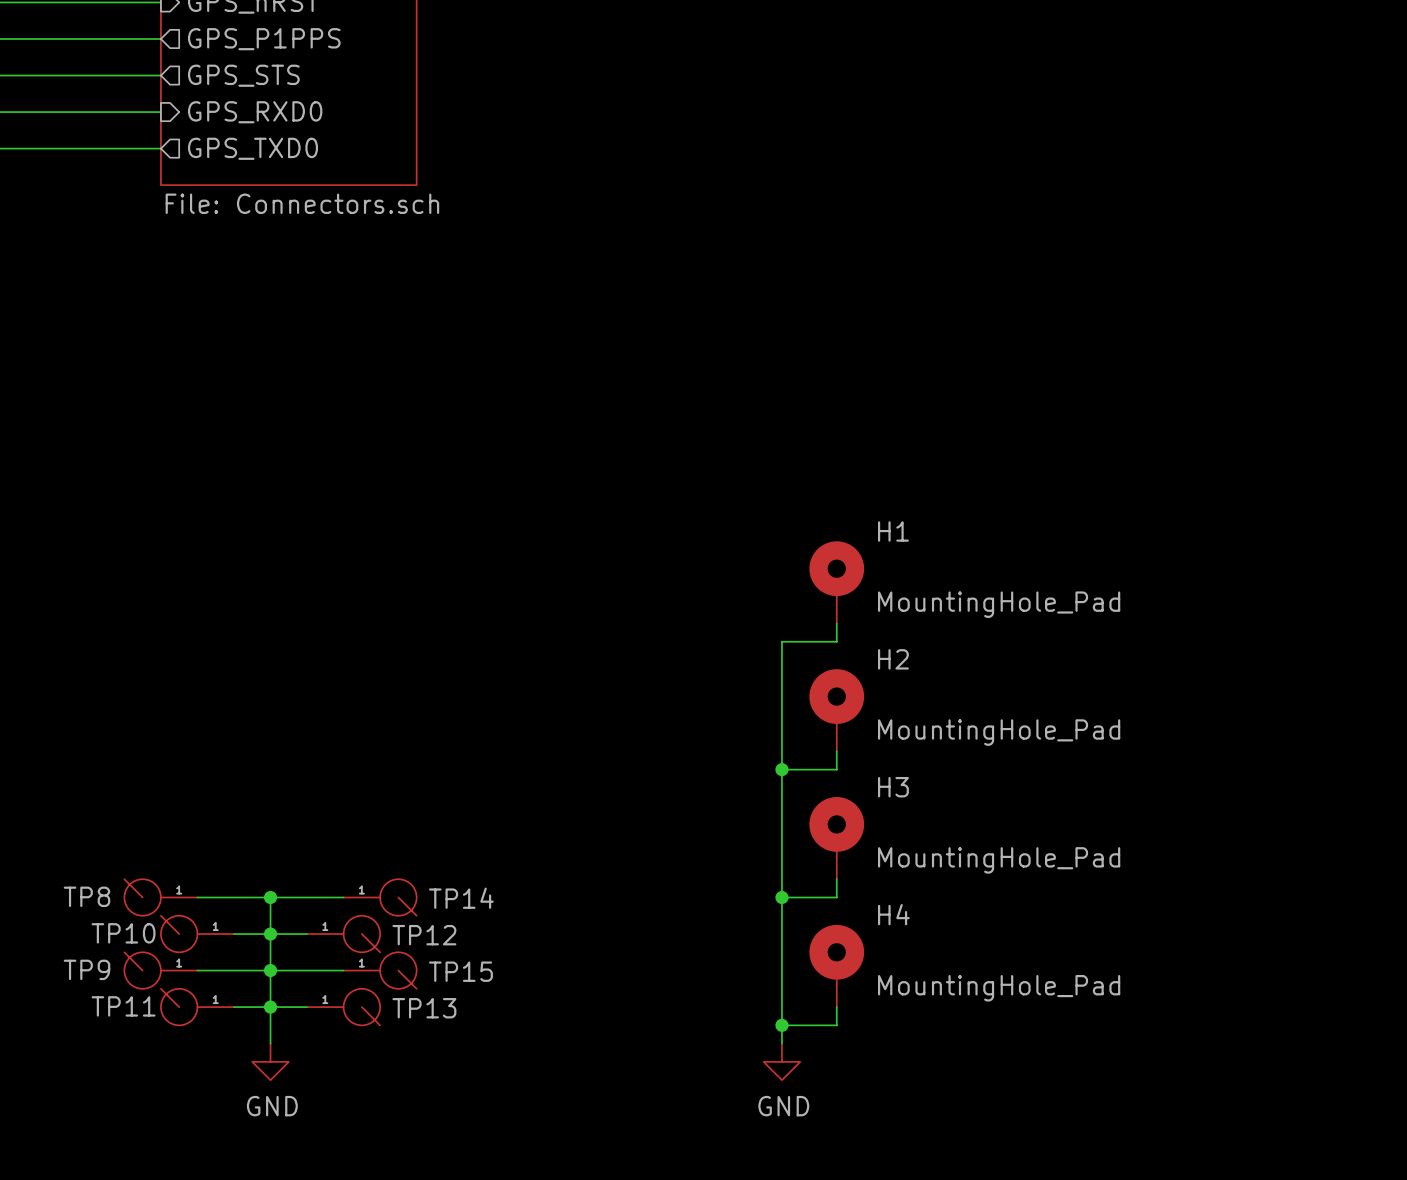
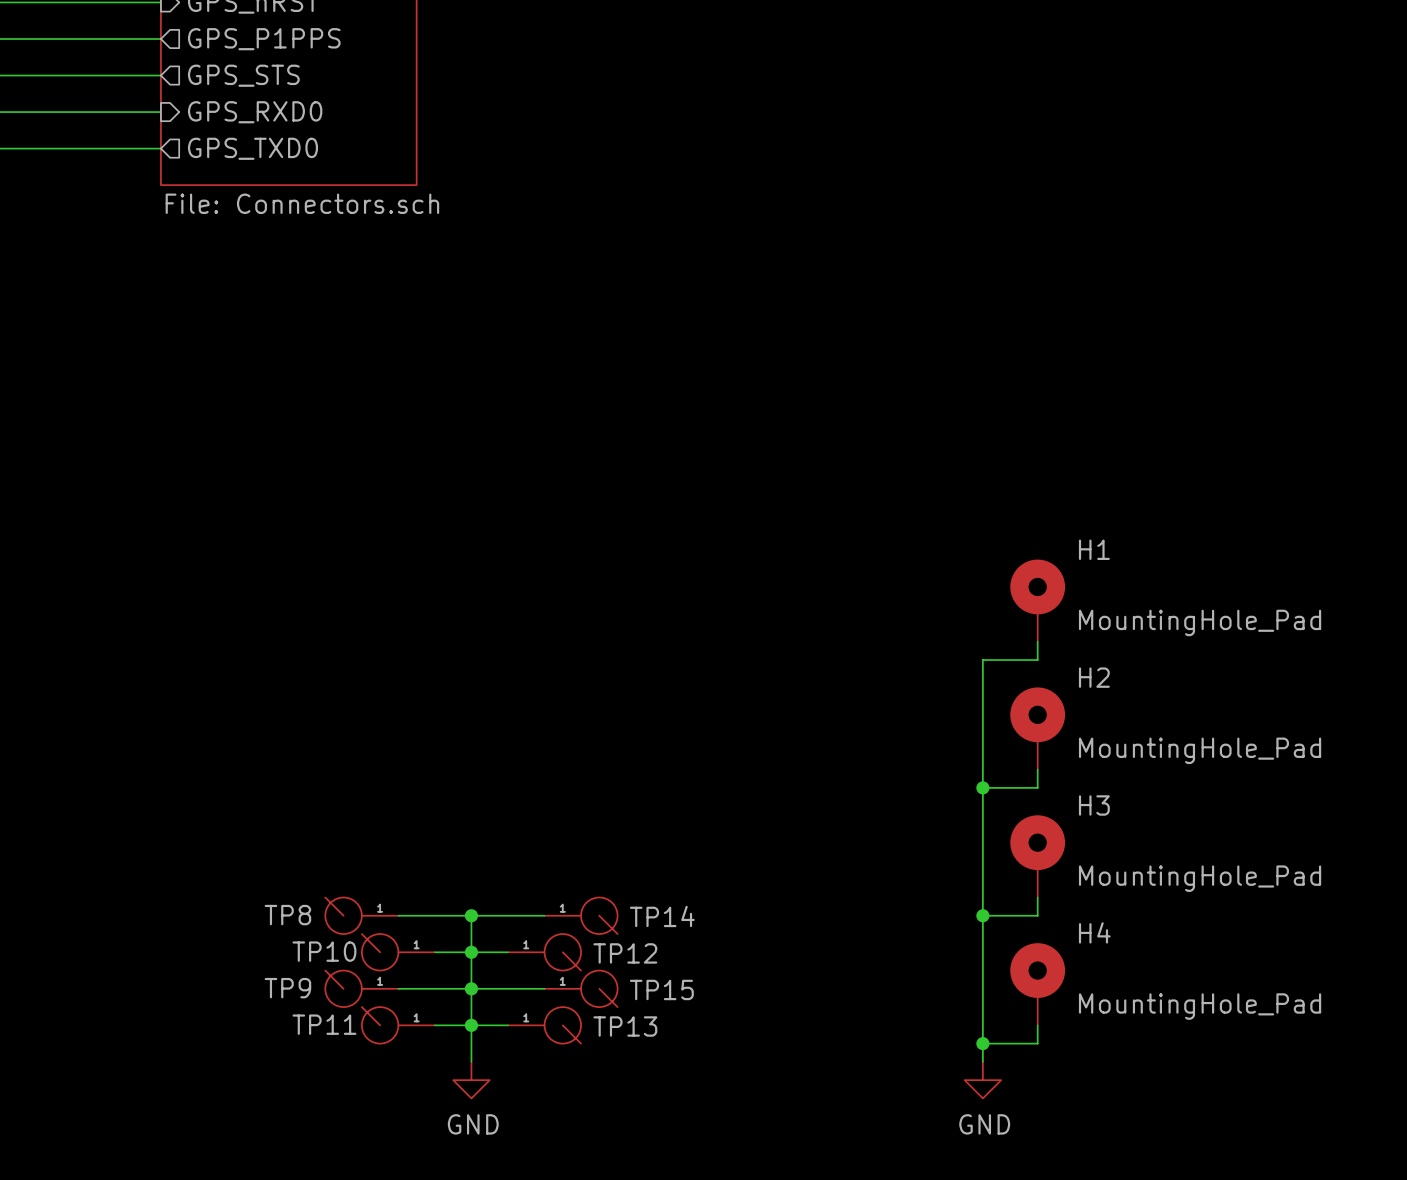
H1 position: (836, 582) -> (1037, 600)
wire: (836, 623) (836, 641) (781, 641) (781, 1043) -> (1037, 641) (1037, 660) (982, 660) (982, 1061)
H2 position: (836, 710) -> (1037, 728)
wire: (836, 751) (836, 769) (781, 769) -> (1037, 769) (1037, 787) (982, 787)
junction: (781, 769) -> none
junction: none -> (982, 787)
H3 position: (836, 838) -> (1037, 856)
wire: (836, 879) (836, 897) (781, 897) -> (1037, 897) (1037, 915) (982, 915)
TP8 position: (160, 897) -> (361, 915)
wire: (197, 897) (343, 897) -> (398, 915) (544, 915)
wire: (270, 897) (270, 1043) -> (471, 915) (471, 1061)
junction: (270, 897) -> none
TP14 position: (380, 897) -> (581, 915)
junction: (781, 897) -> none
junction: none -> (471, 915)
junction: none -> (982, 915)
TP10 position: (197, 934) -> (398, 952)
wire: (233, 934) (307, 934) -> (434, 952) (507, 952)
junction: (270, 934) -> none
TP12 position: (343, 934) -> (544, 952)
junction: none -> (471, 952)
H4 position: (836, 965) -> (1037, 984)
TP9 position: (160, 970) -> (361, 988)
wire: (197, 970) (343, 970) -> (398, 988) (544, 988)
junction: (270, 970) -> none
TP15 position: (380, 970) -> (581, 988)
junction: none -> (471, 988)
TP11 position: (197, 1007) -> (398, 1025)
wire: (233, 1007) (307, 1007) -> (434, 1025) (507, 1025)
junction: (270, 1007) -> none
TP13 position: (343, 1007) -> (544, 1025)
wire: (836, 1007) (836, 1025) (781, 1025) -> (1037, 1025) (1037, 1043) (982, 1043)
junction: none -> (471, 1025)
junction: (781, 1025) -> none
junction: none -> (982, 1043)
power symbol: GND (270, 1061) -> none
power symbol: GND (781, 1061) -> none
power symbol: none -> GND (471, 1080)
power symbol: none -> GND (982, 1080)

